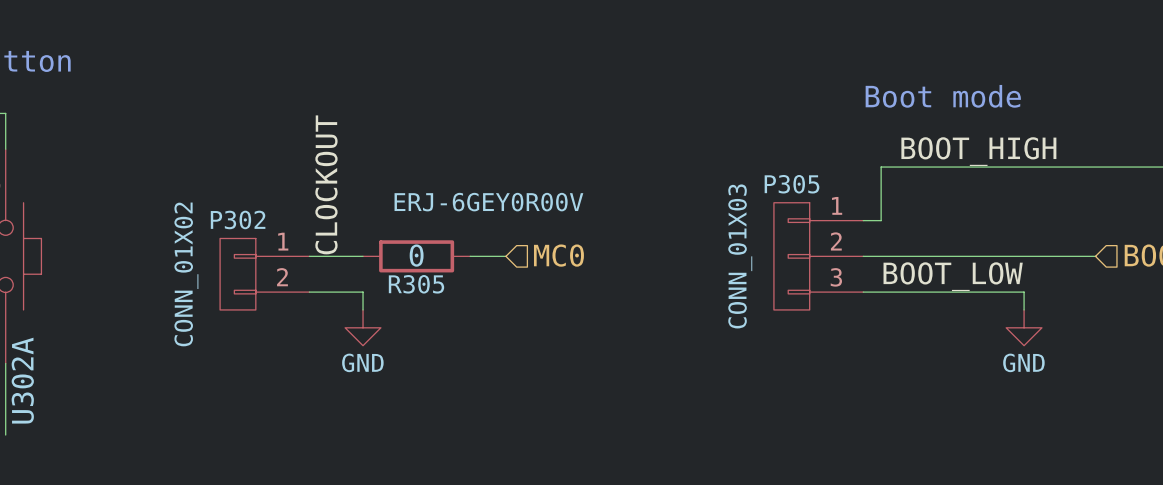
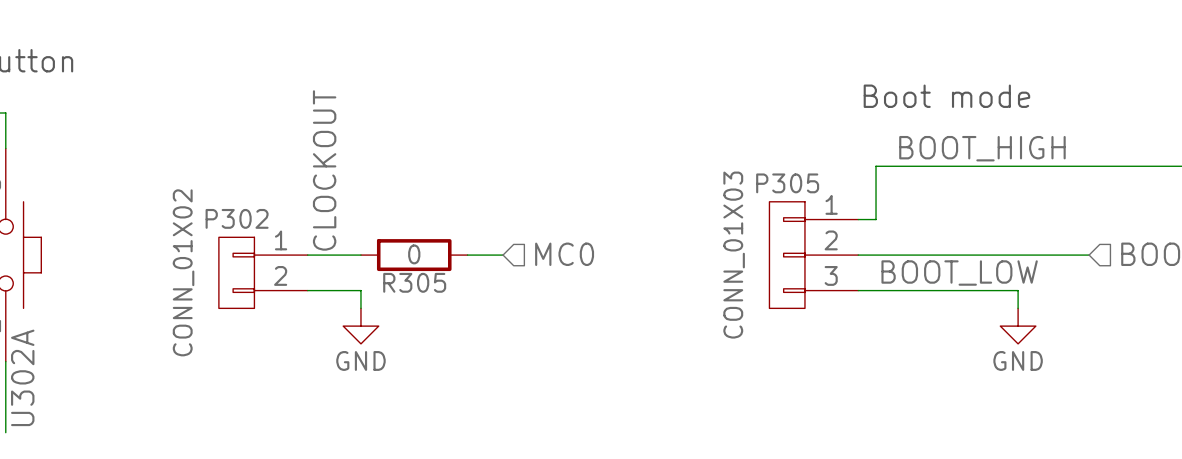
R305 value: ERJ-6GEY0R00V (488, 202) -> 0 (414, 254)
R305 text: 0 (416, 255) -> none

